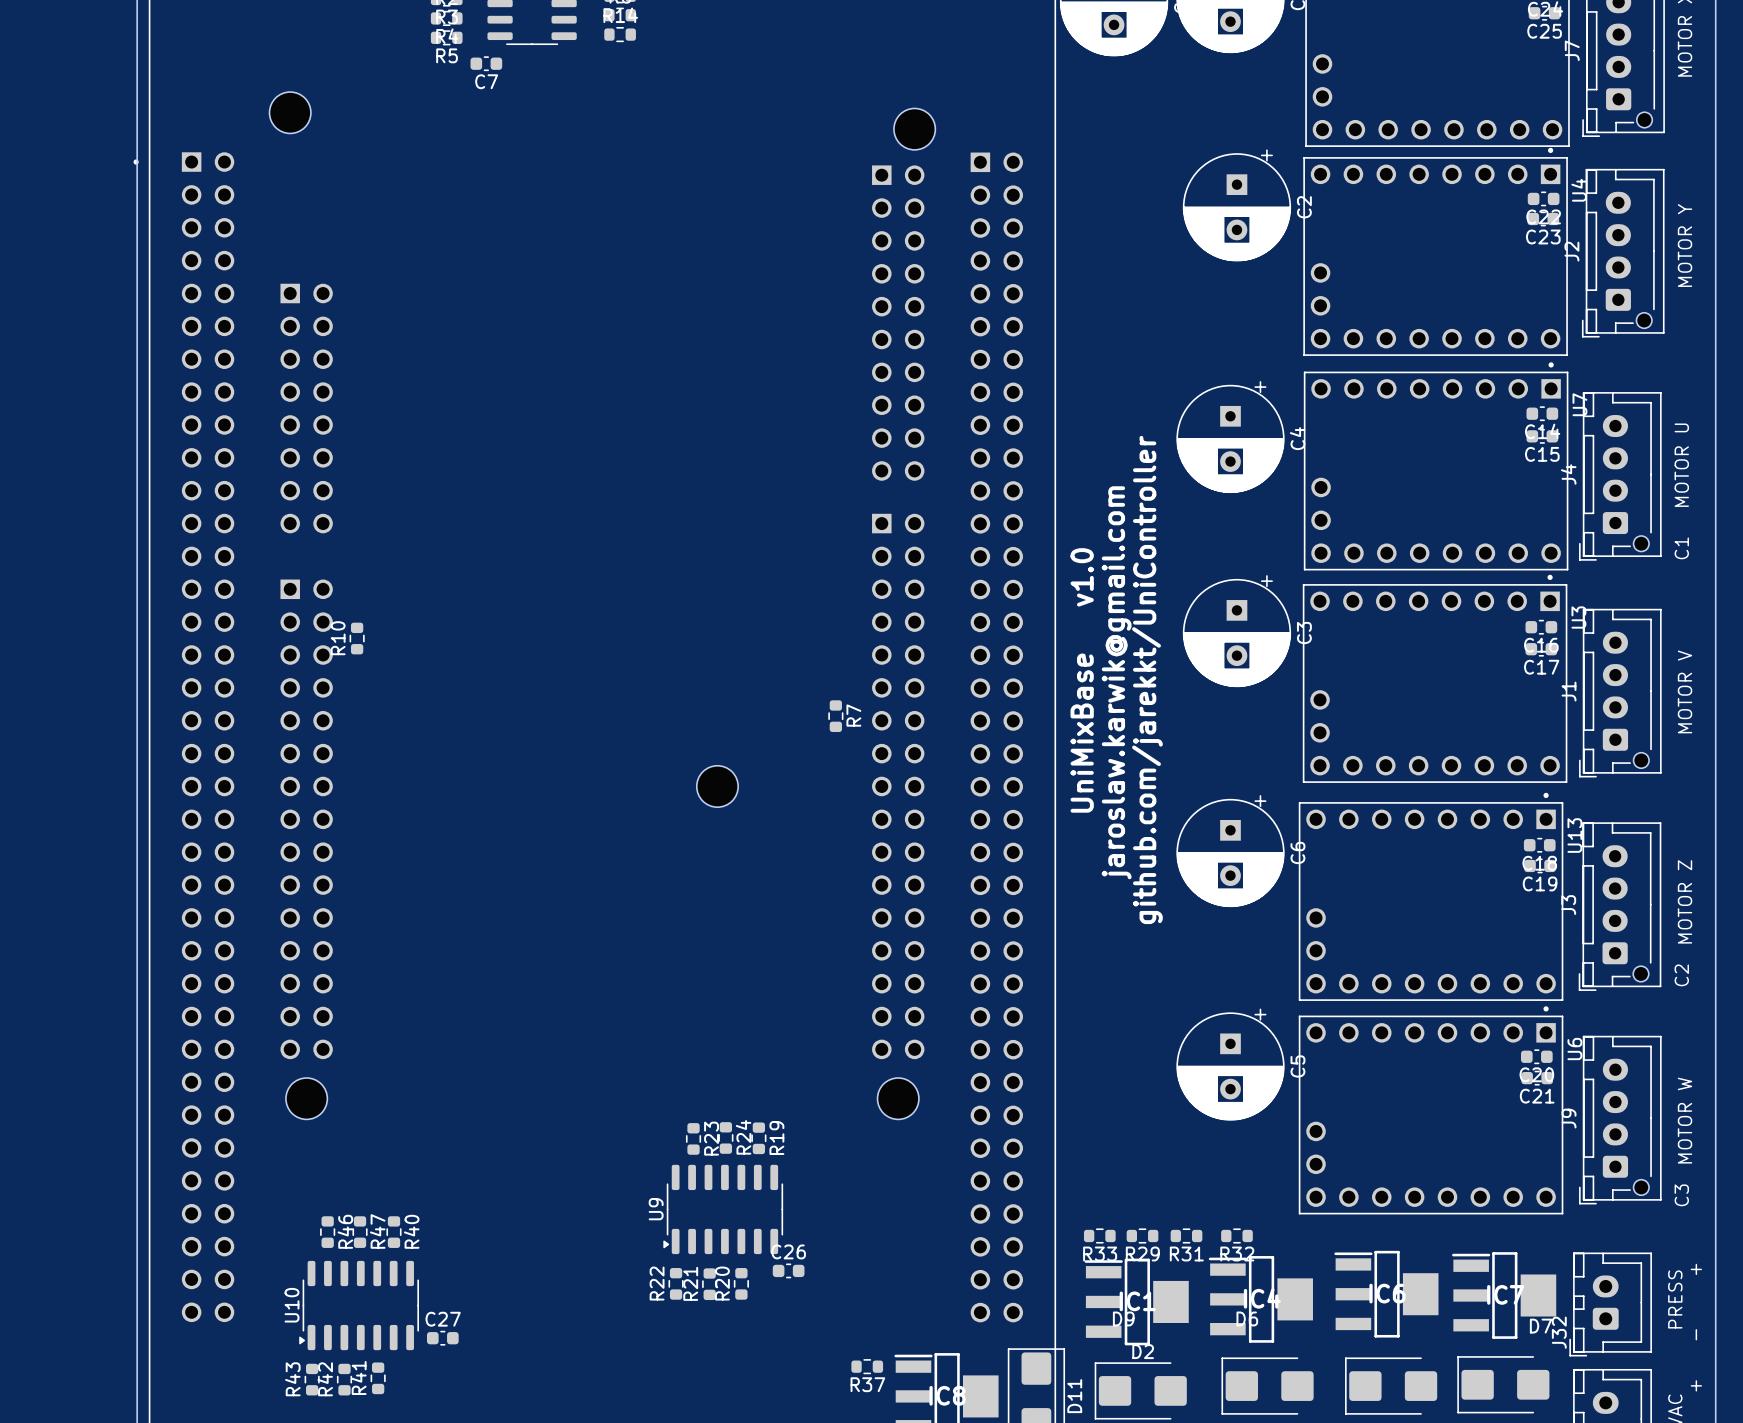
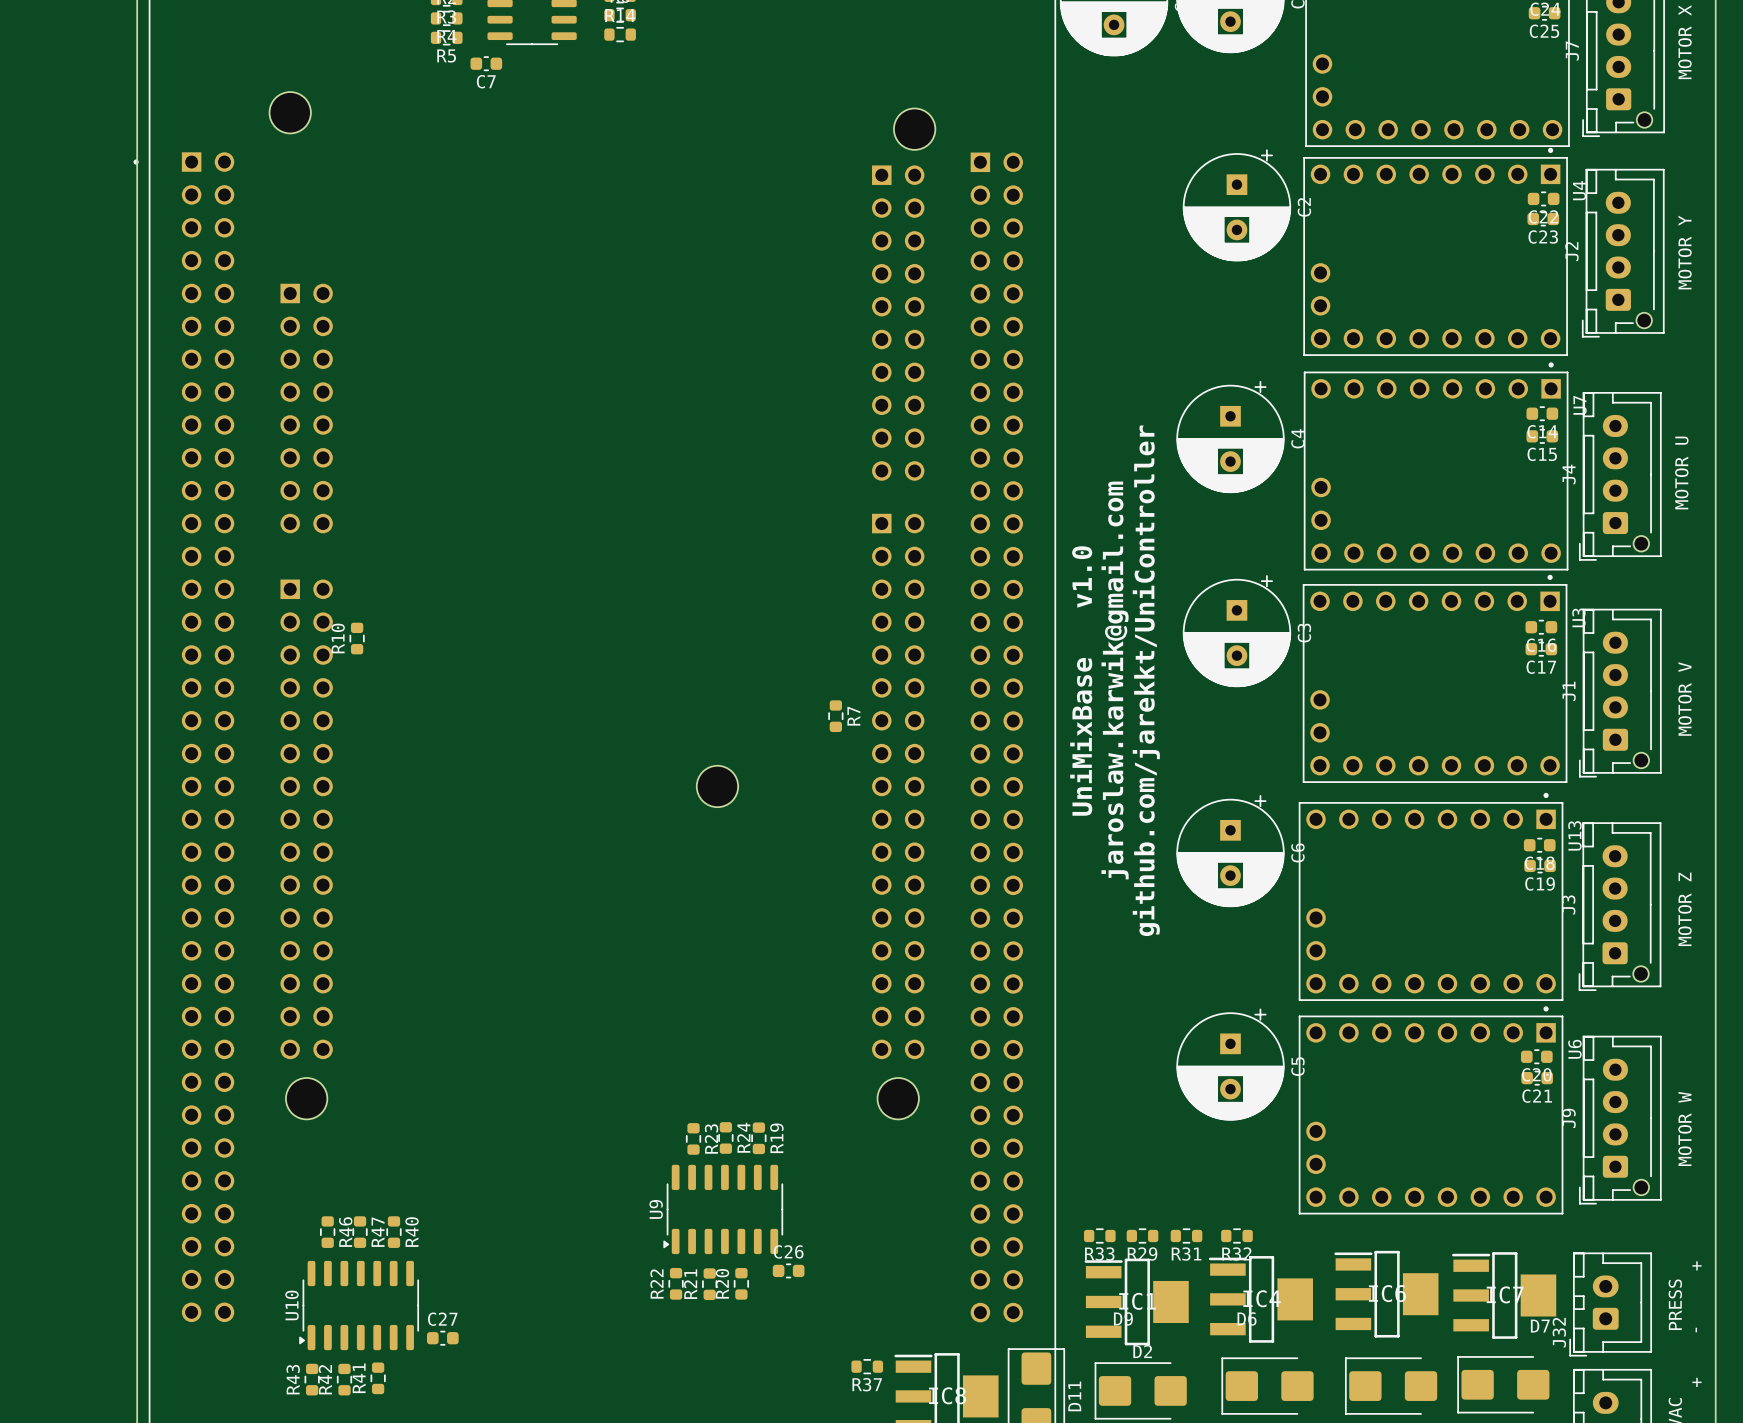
text: C1 (1681, 548) -> none
text: C2 (1681, 975) -> none
text: C3 (1681, 1195) -> none

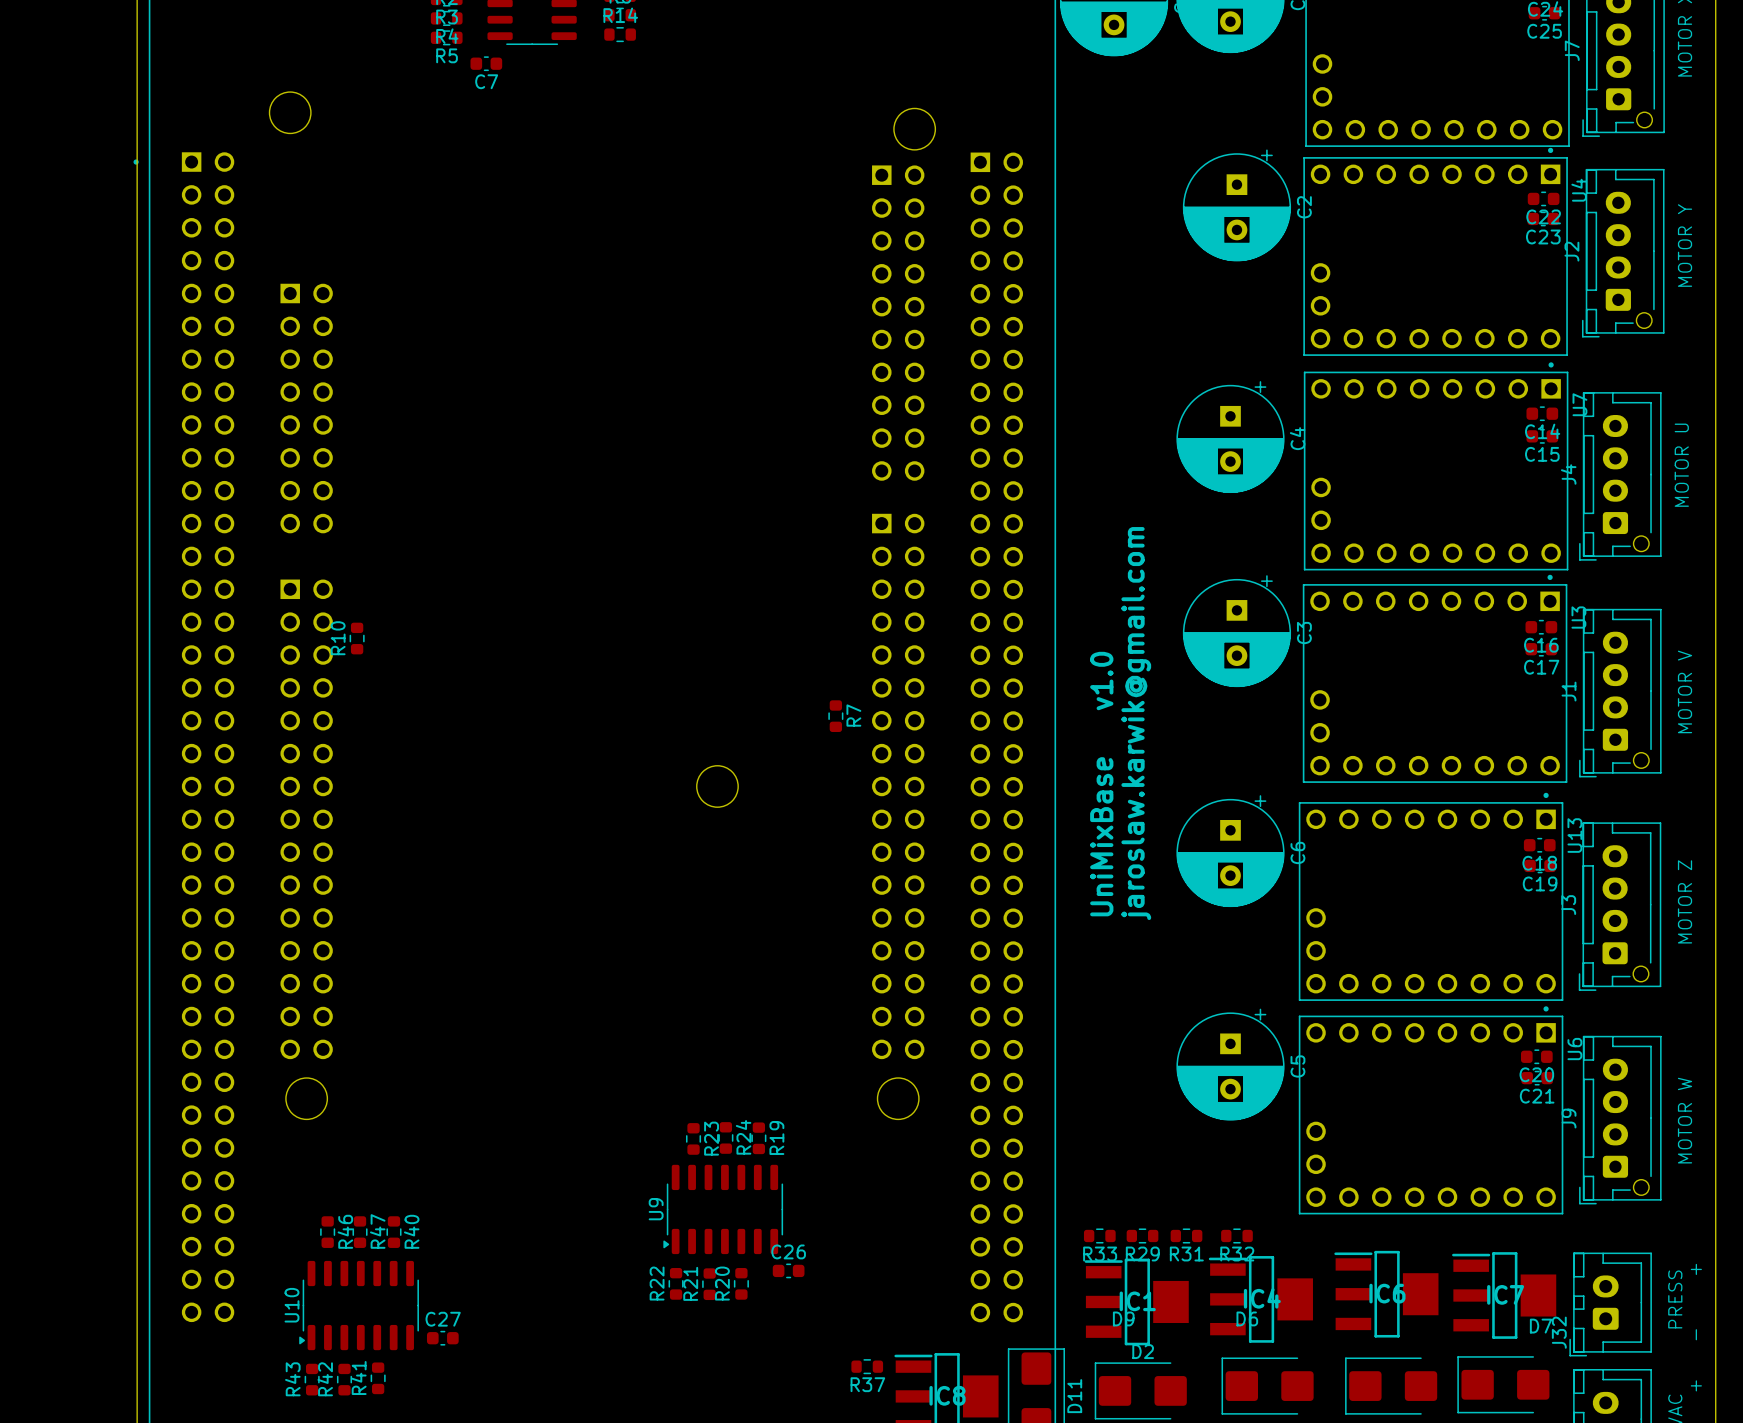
text position: jaroslaw.karwik@gmail.com (1115, 680) -> jaroslaw.karwik@gmail.com (1136, 723)
text: github.com/jarekkt/UniController (1146, 680) -> none
text position: UniMixBase v1.0 (1081, 681) -> UniMixBase v1.0 (1101, 784)

